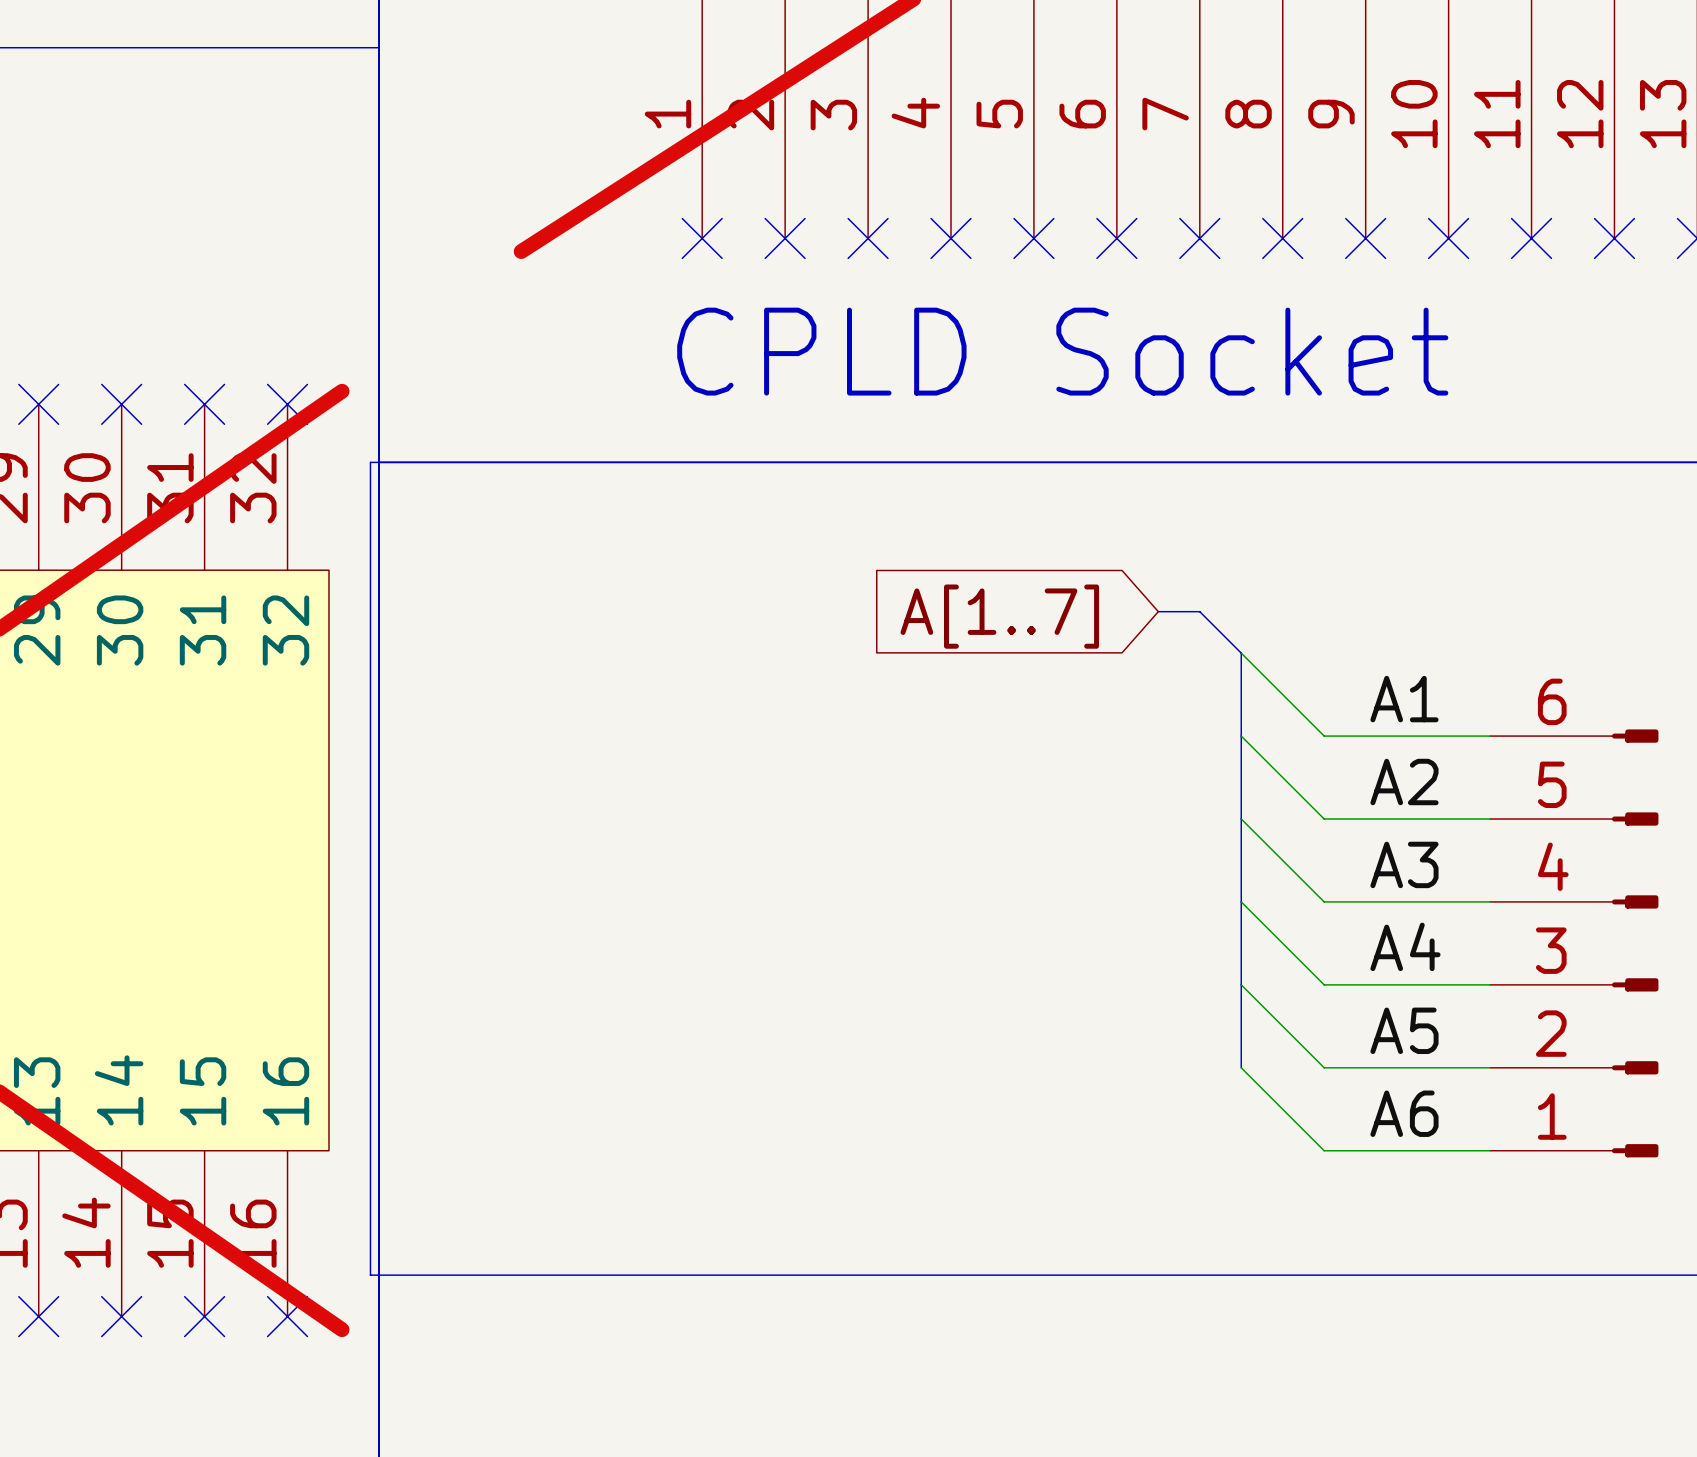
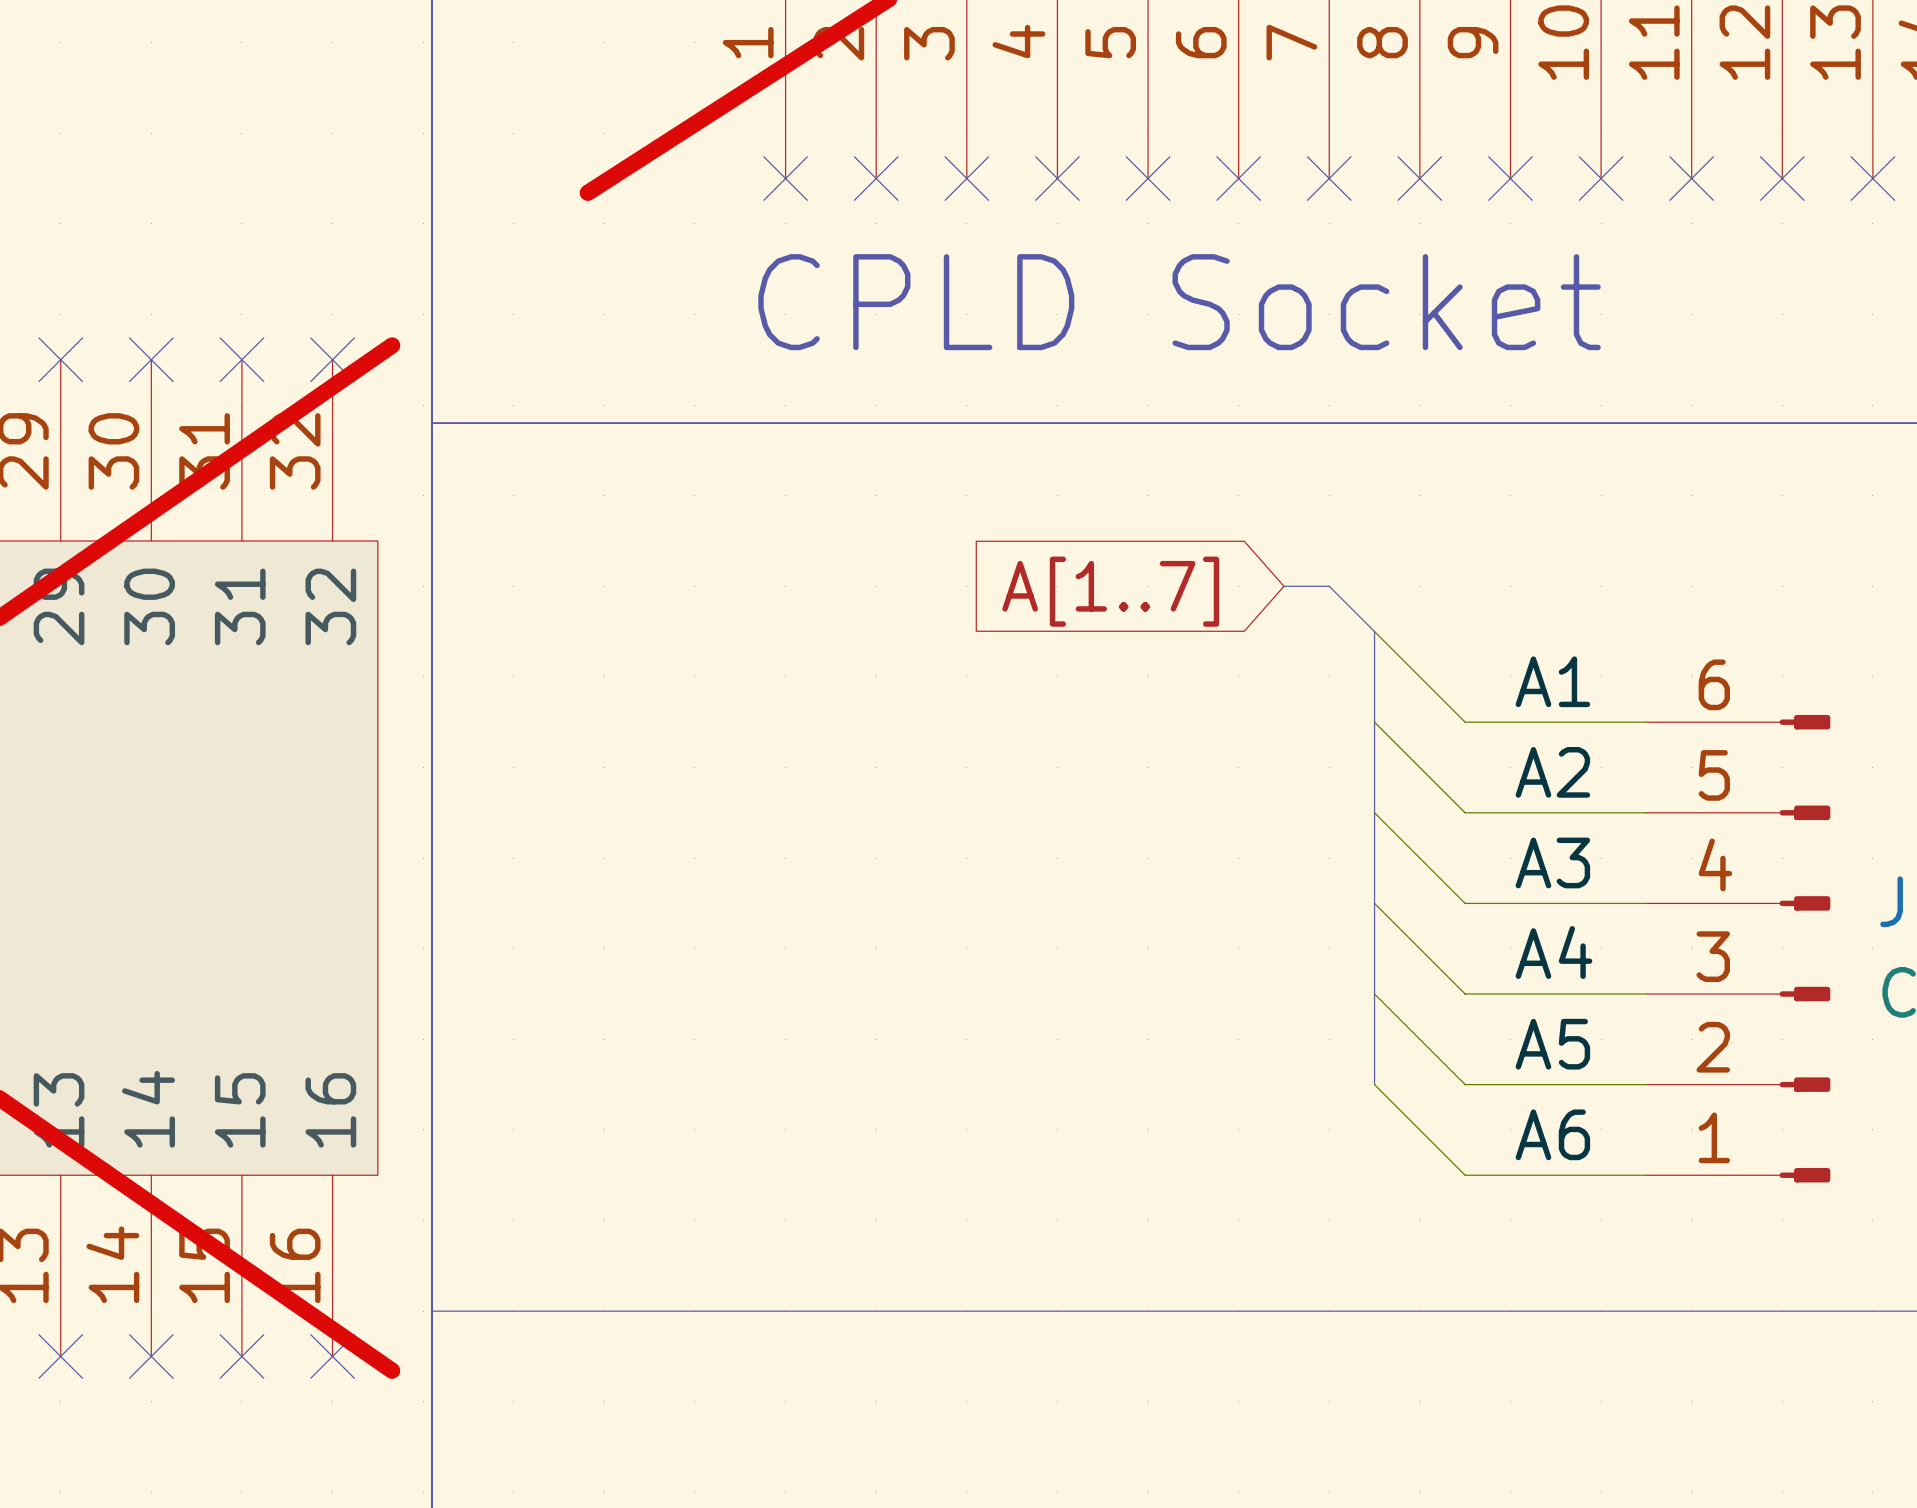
line: (378, 462) (370, 462) (370, 1275) (378, 1275) -> none

